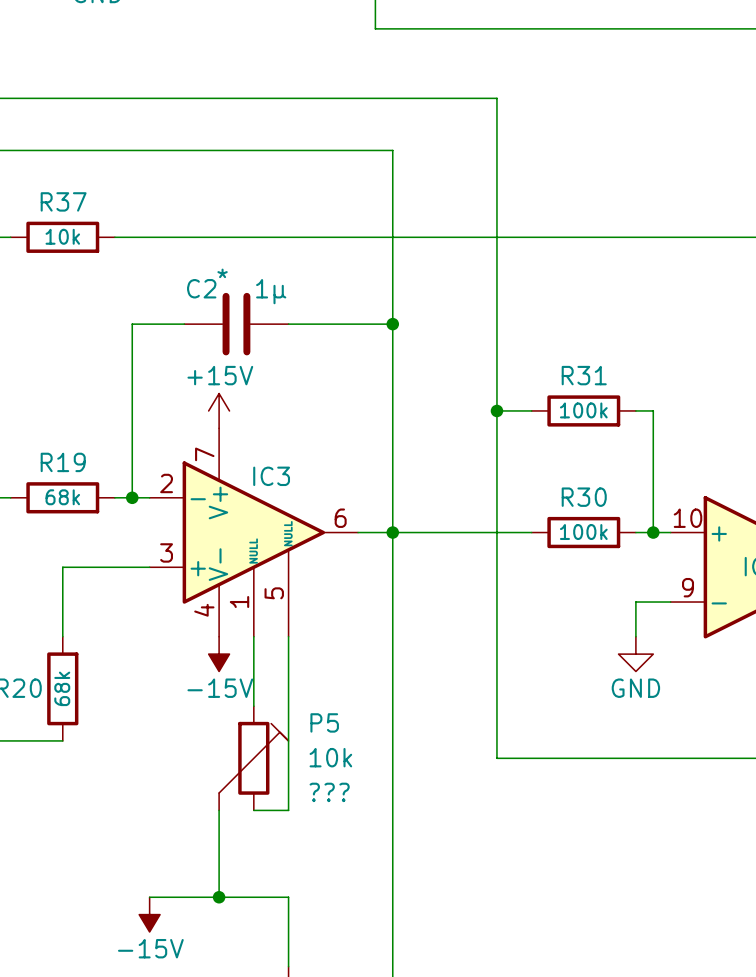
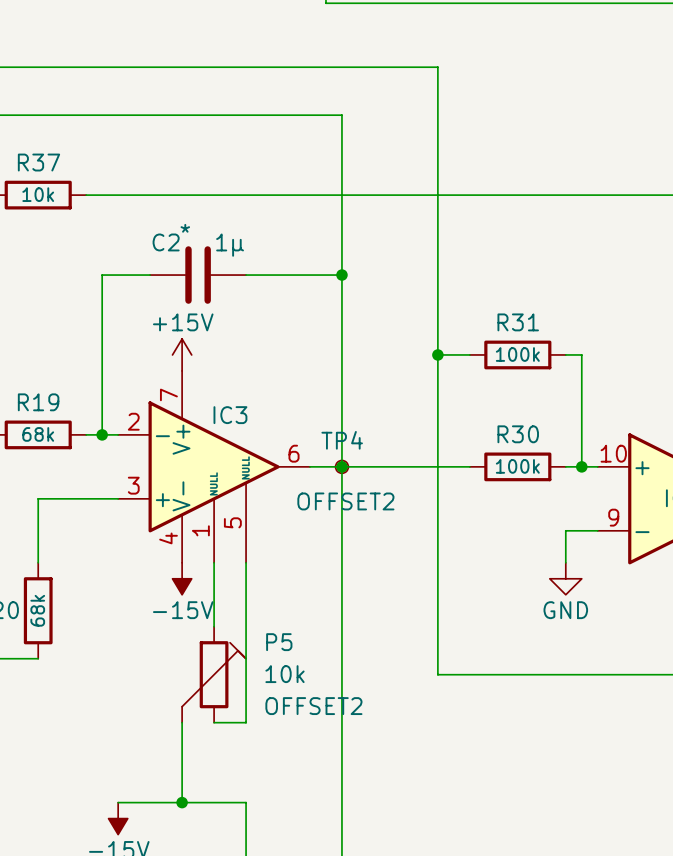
TP4: none -> OFFSET2 (341, 466)
P5 text: ??? (329, 792) -> OFFSET2 (313, 706)

